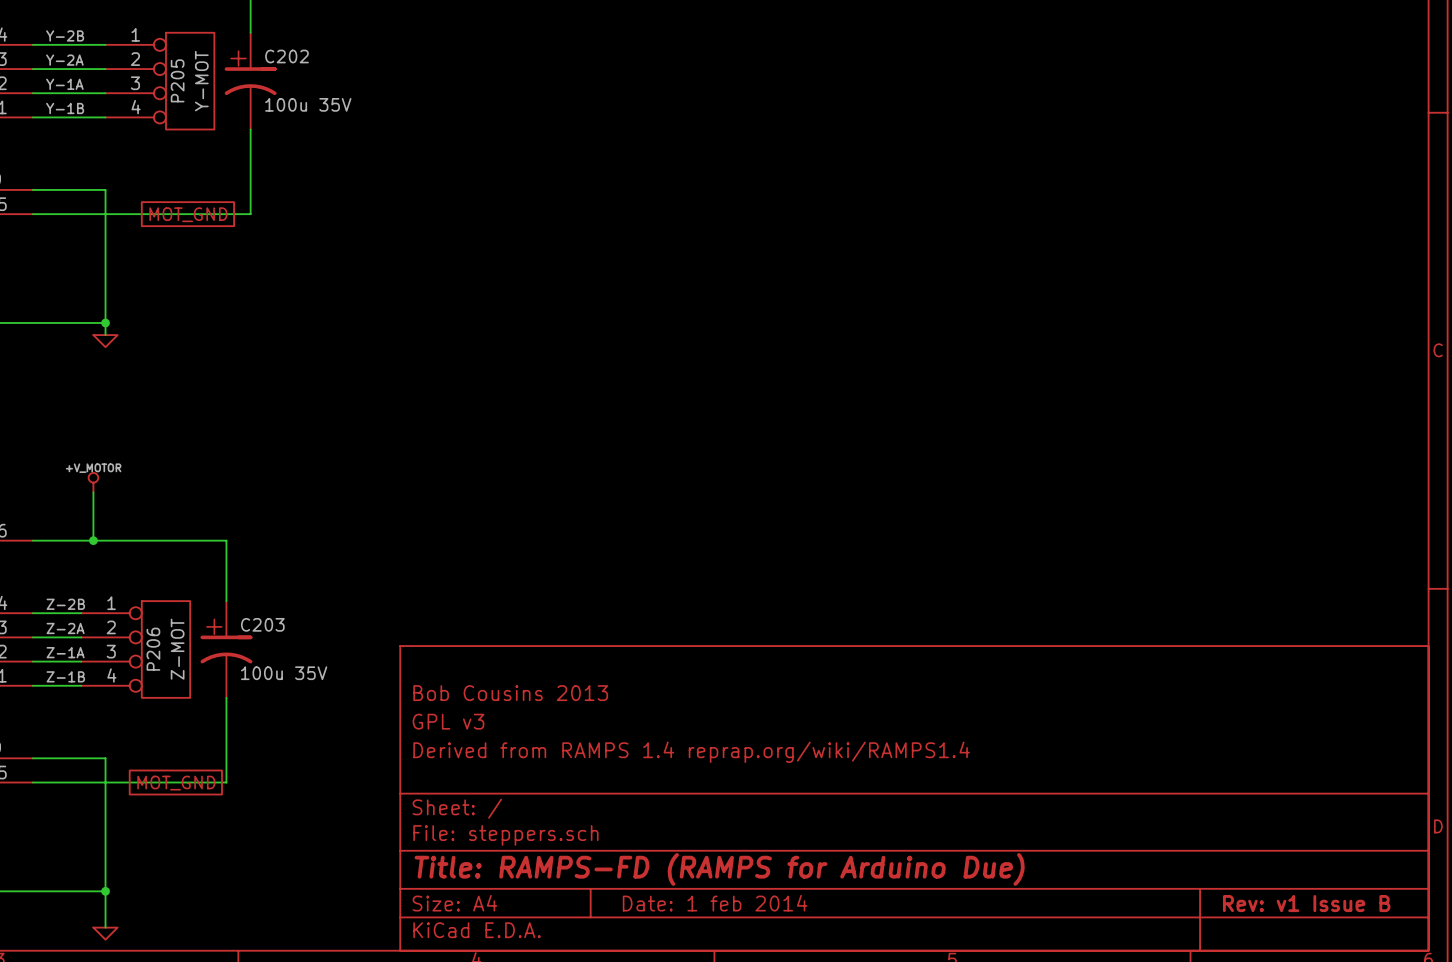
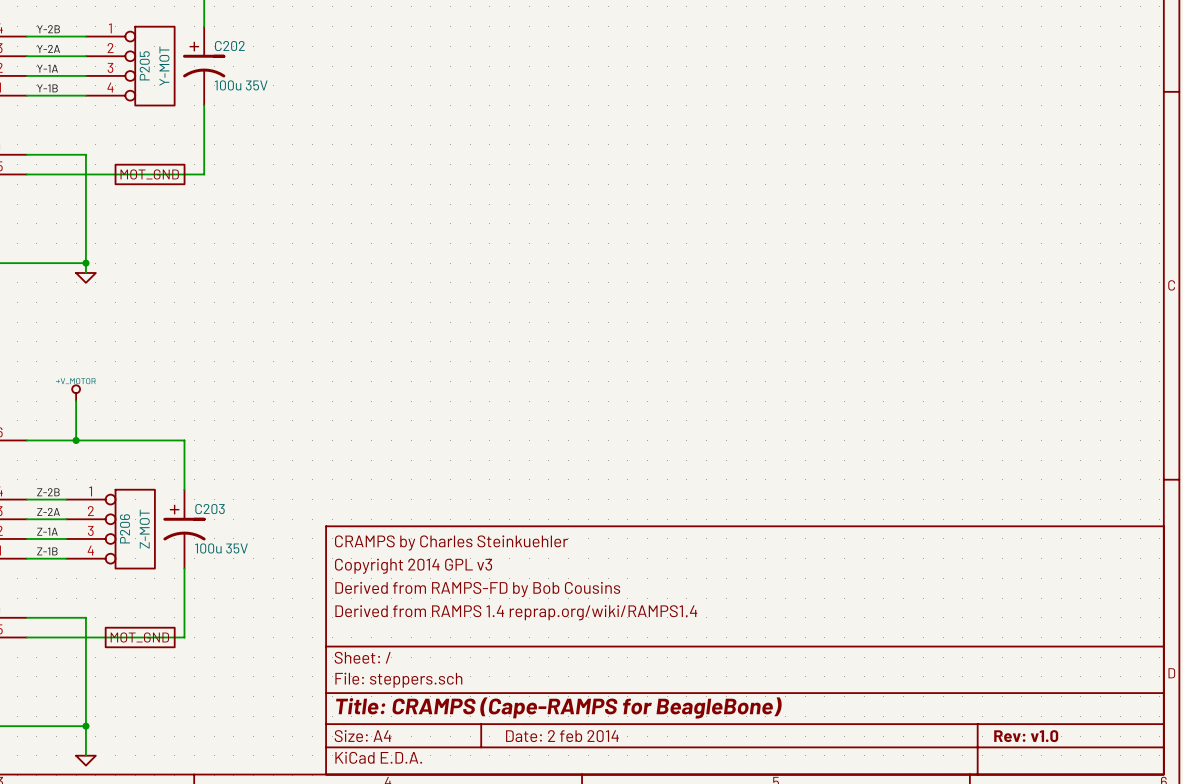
title block: none -> CRAMPS by Charles Steinkuehler (451, 542)
title block: Bob Cousins 2013 (510, 693) -> Copyright 2014 GPL v3 (413, 566)
title block: GPL v3 (448, 721) -> Derived from RAMPS-FD by Bob Cousins (477, 589)
title block: Title: RAMPS-FD (RAMPS for Arduino Due) (719, 869) -> Title: CRAMPS (Cape-RAMPS for BeagleBone) (558, 708)
title block: Date: 1 feb 2014 (715, 903) -> Date: 2 feb 2014 (562, 736)
title block: Rev: v1 Issue B (1306, 903) -> Rev: v1.0 (1026, 736)

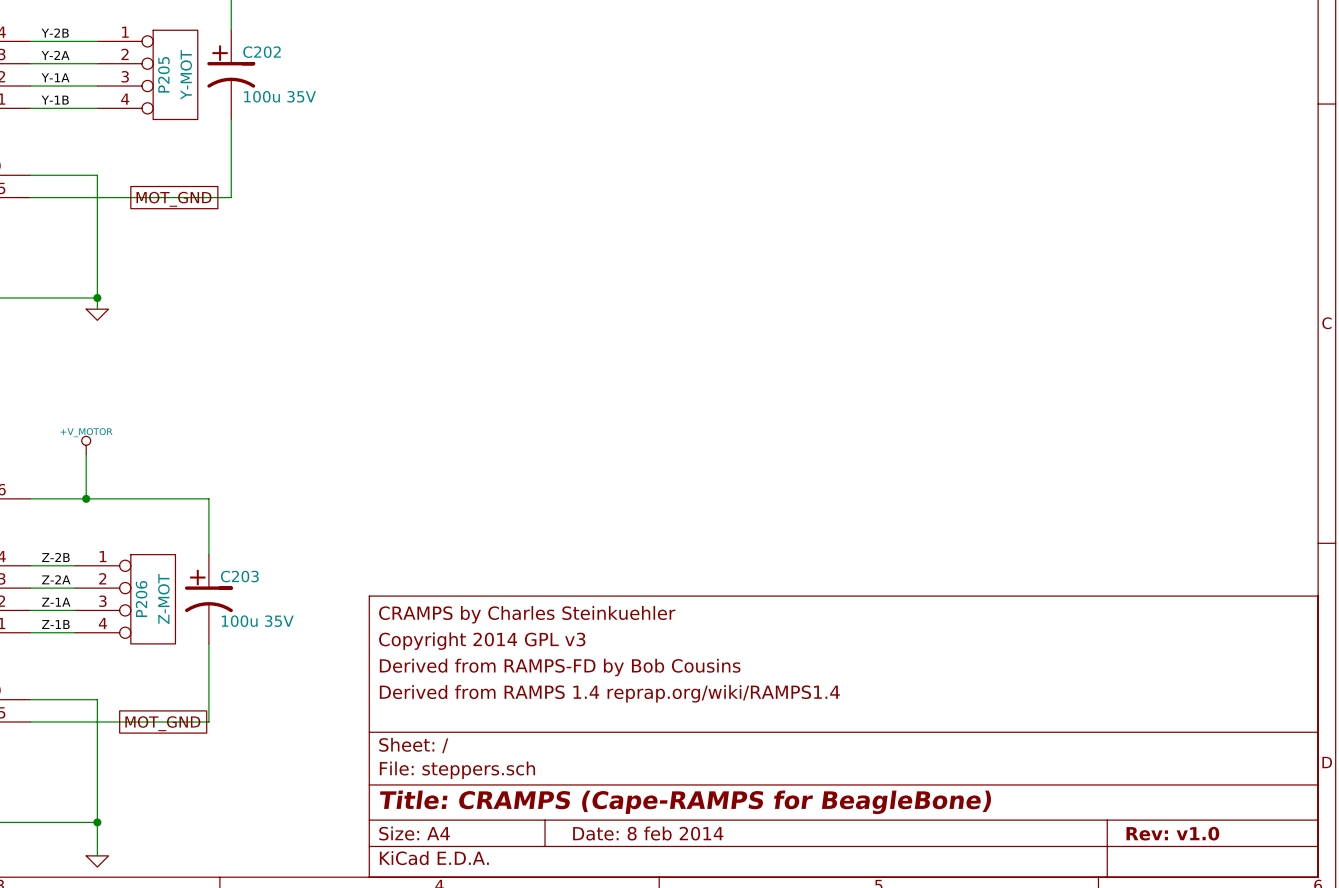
title block: Date: 2 feb 2014 (562, 736) -> Date: 8 feb 2014 (648, 833)

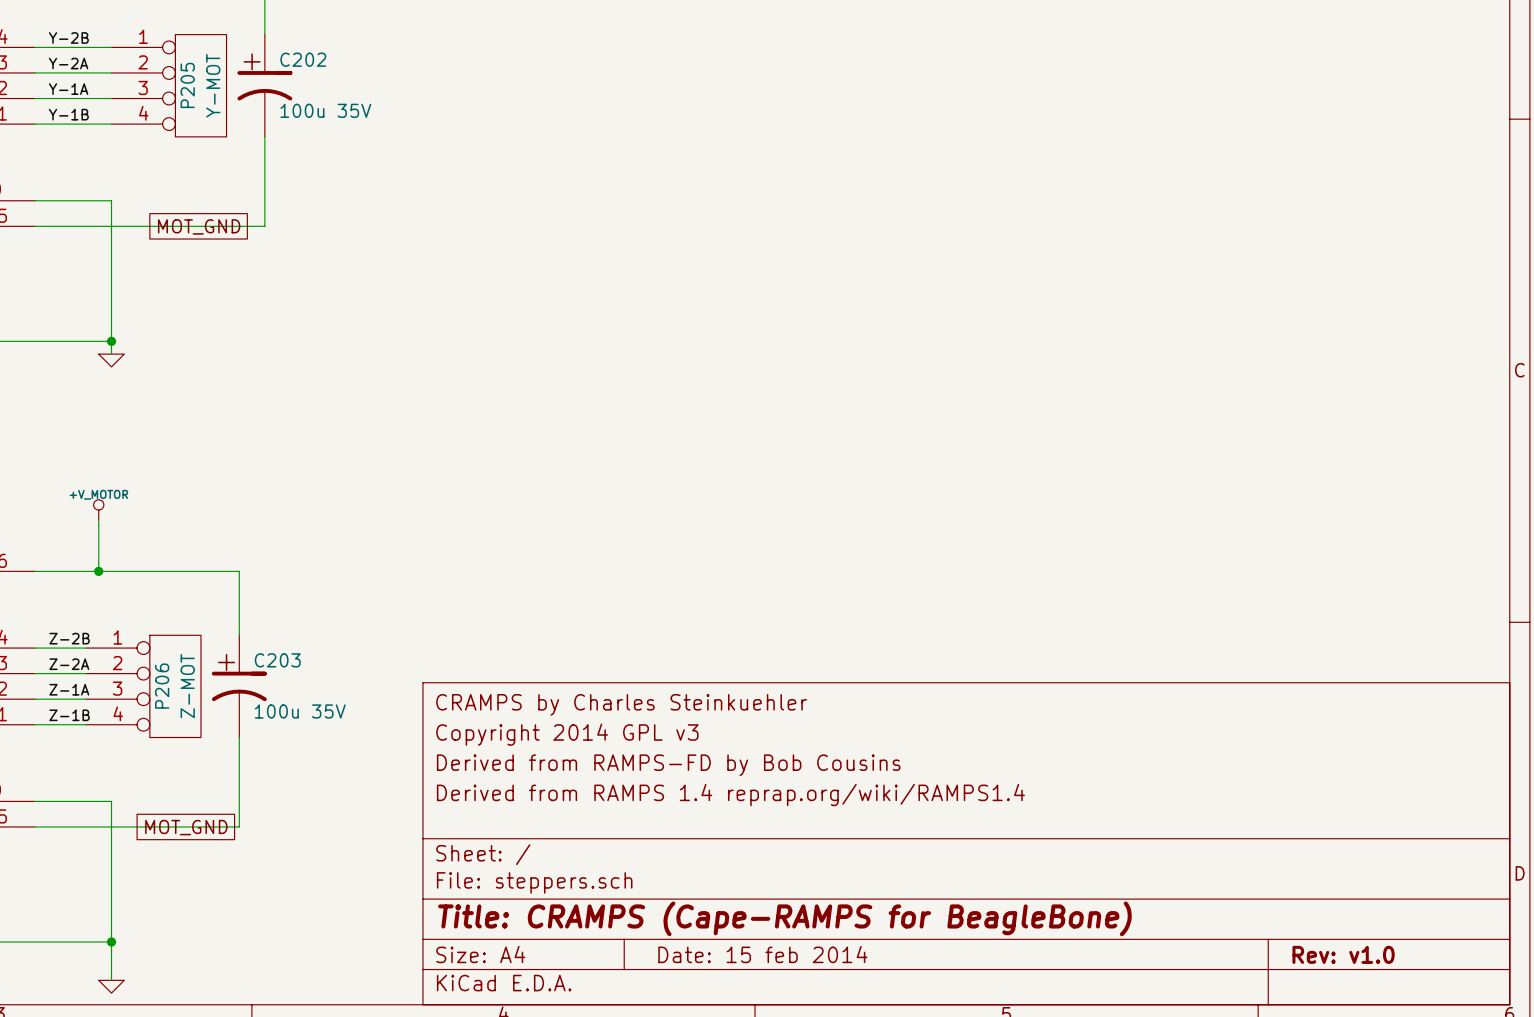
title block: Date: 8 feb 2014 (648, 833) -> Date: 15 feb 2014 (762, 954)

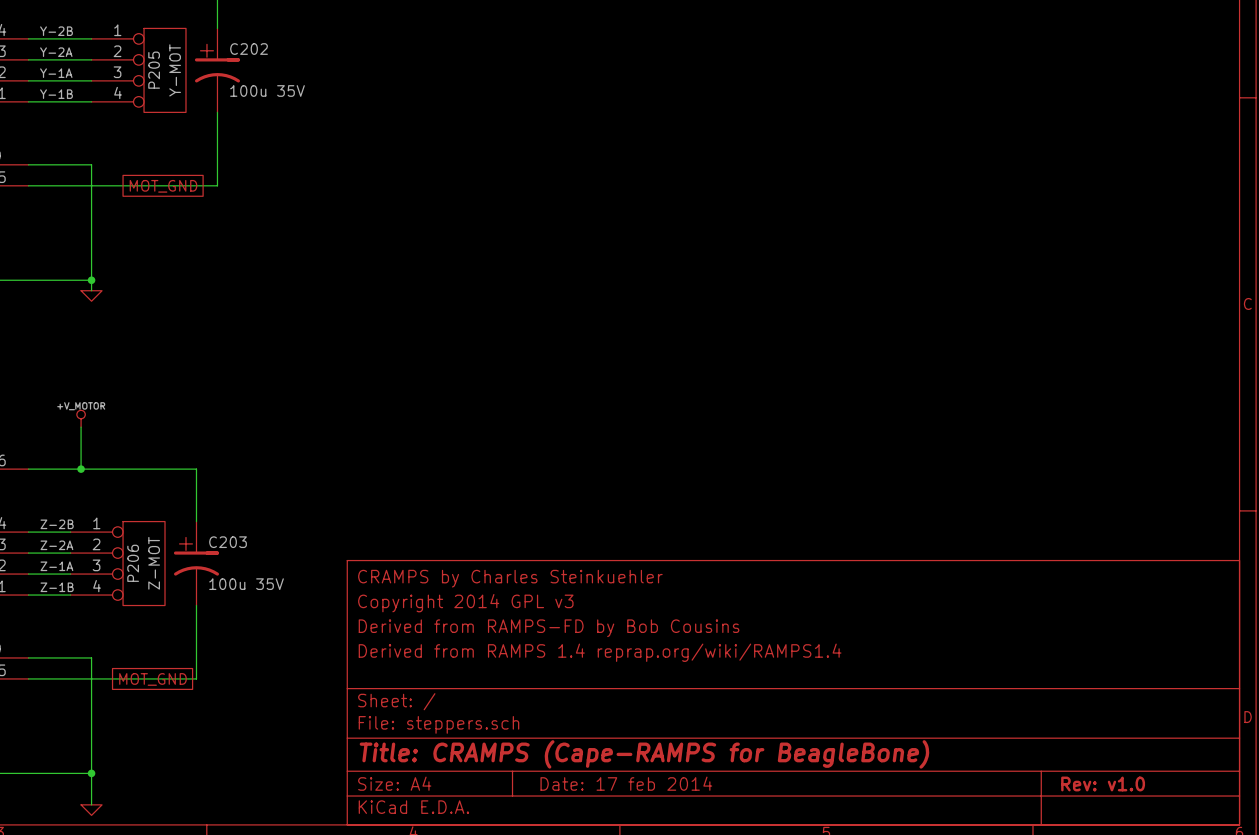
title block: Date: 15 feb 2014 (762, 954) -> Date: 17 feb 2014 (626, 783)

